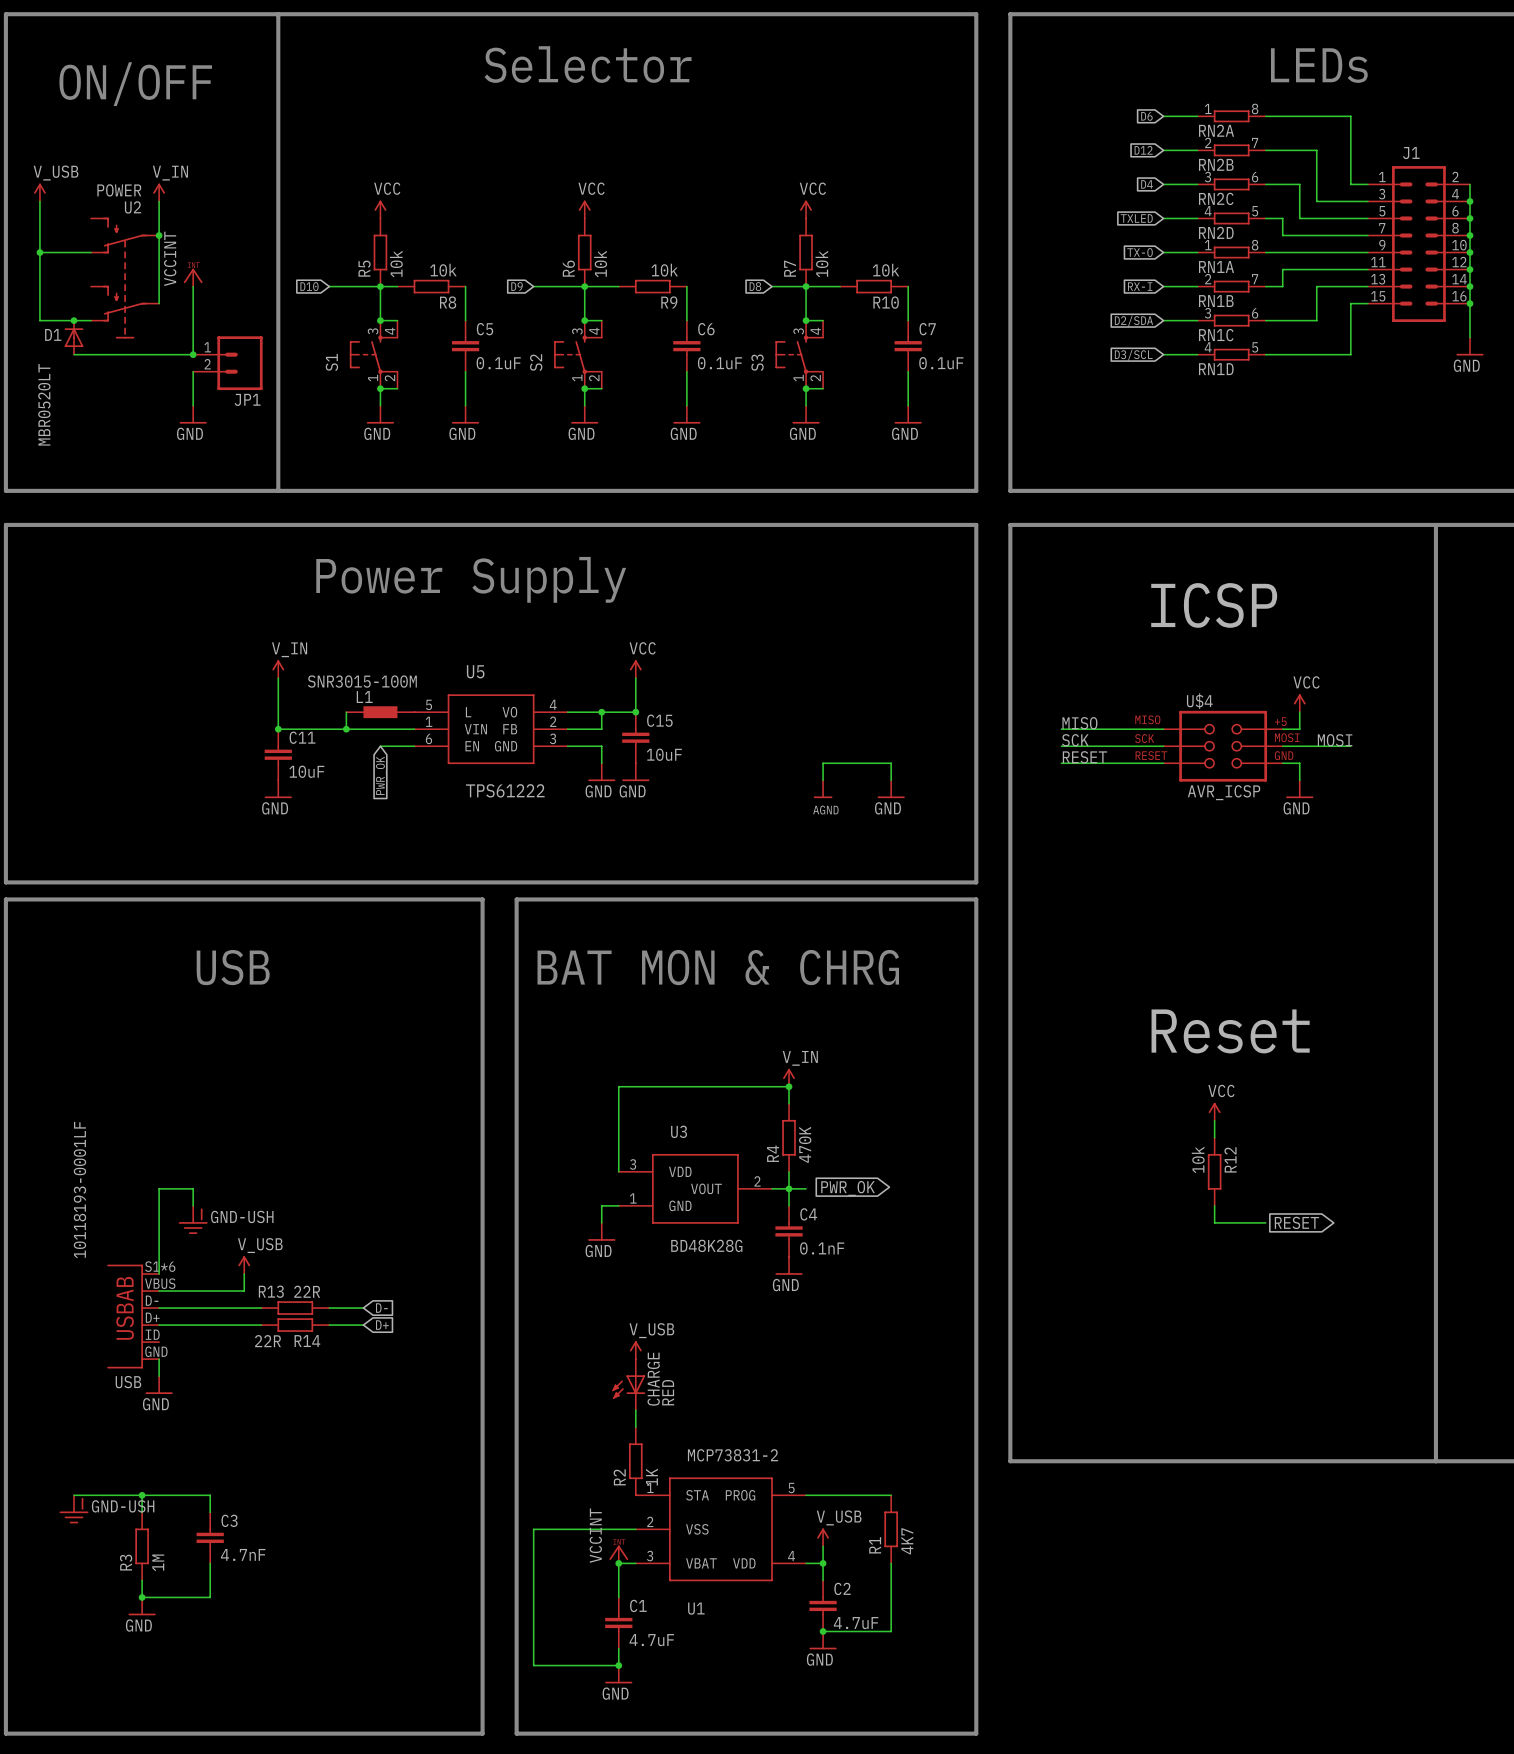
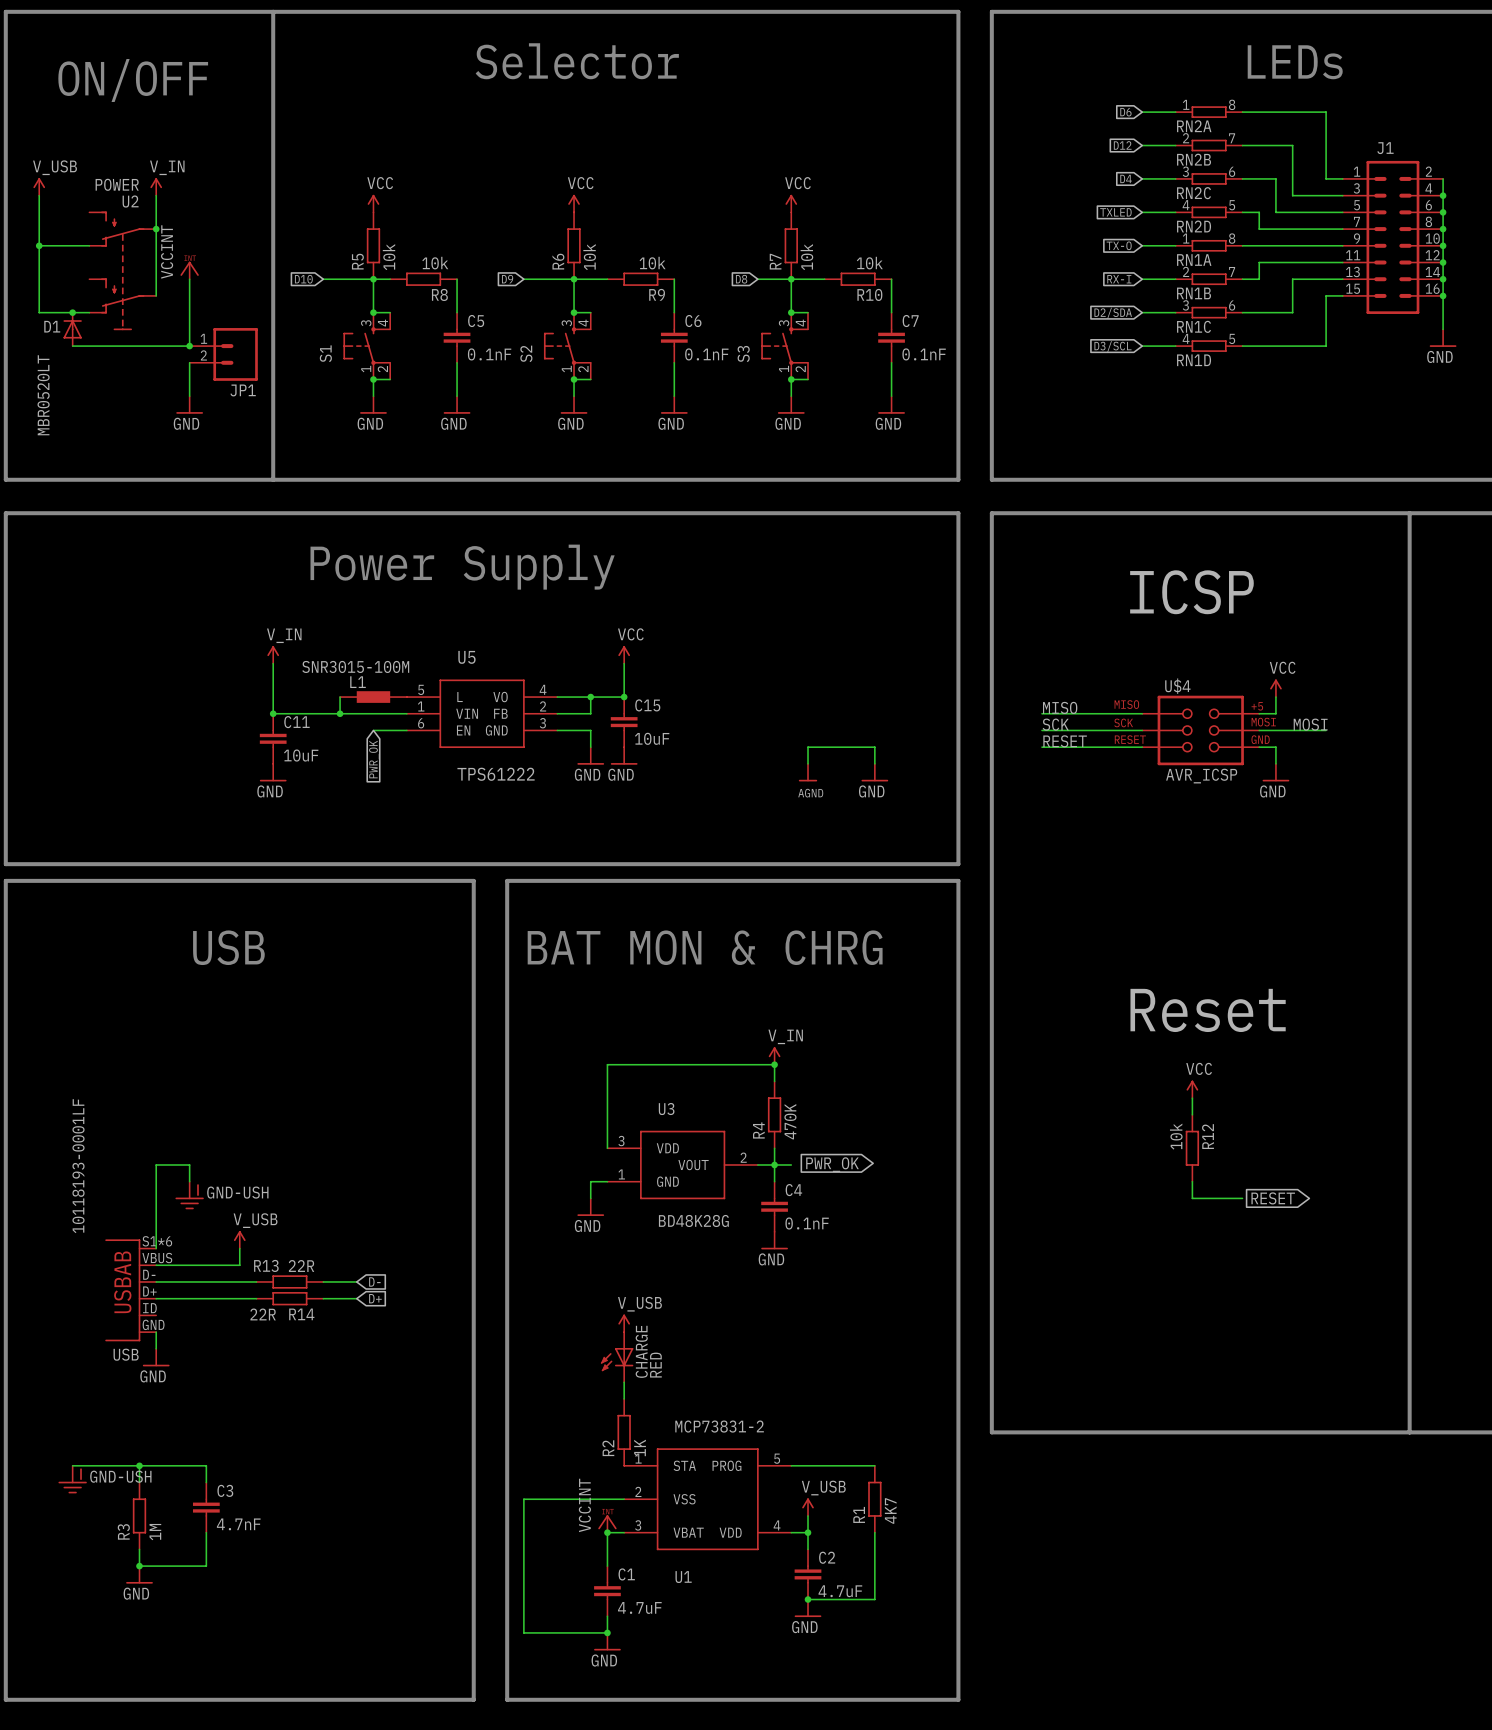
C5 value: 0.1uF (498, 363) -> 0.1nF (489, 354)
C6 value: 0.1uF (720, 363) -> 0.1nF (706, 354)
C7 value: 0.1uF (941, 363) -> 0.1nF (924, 354)

